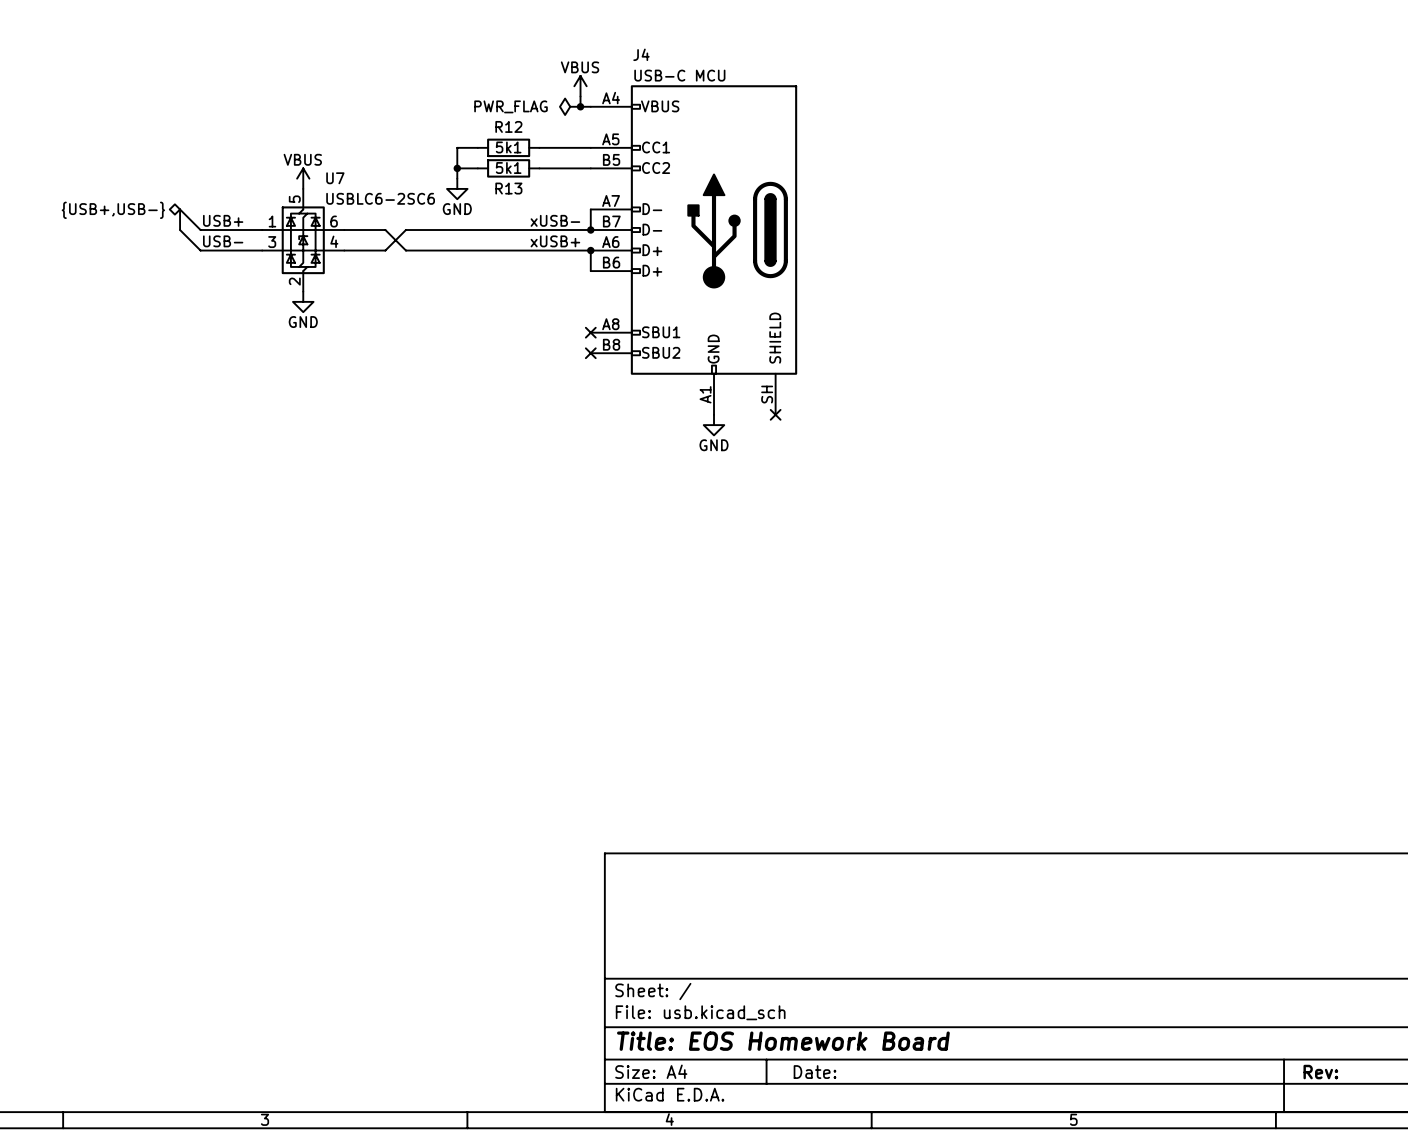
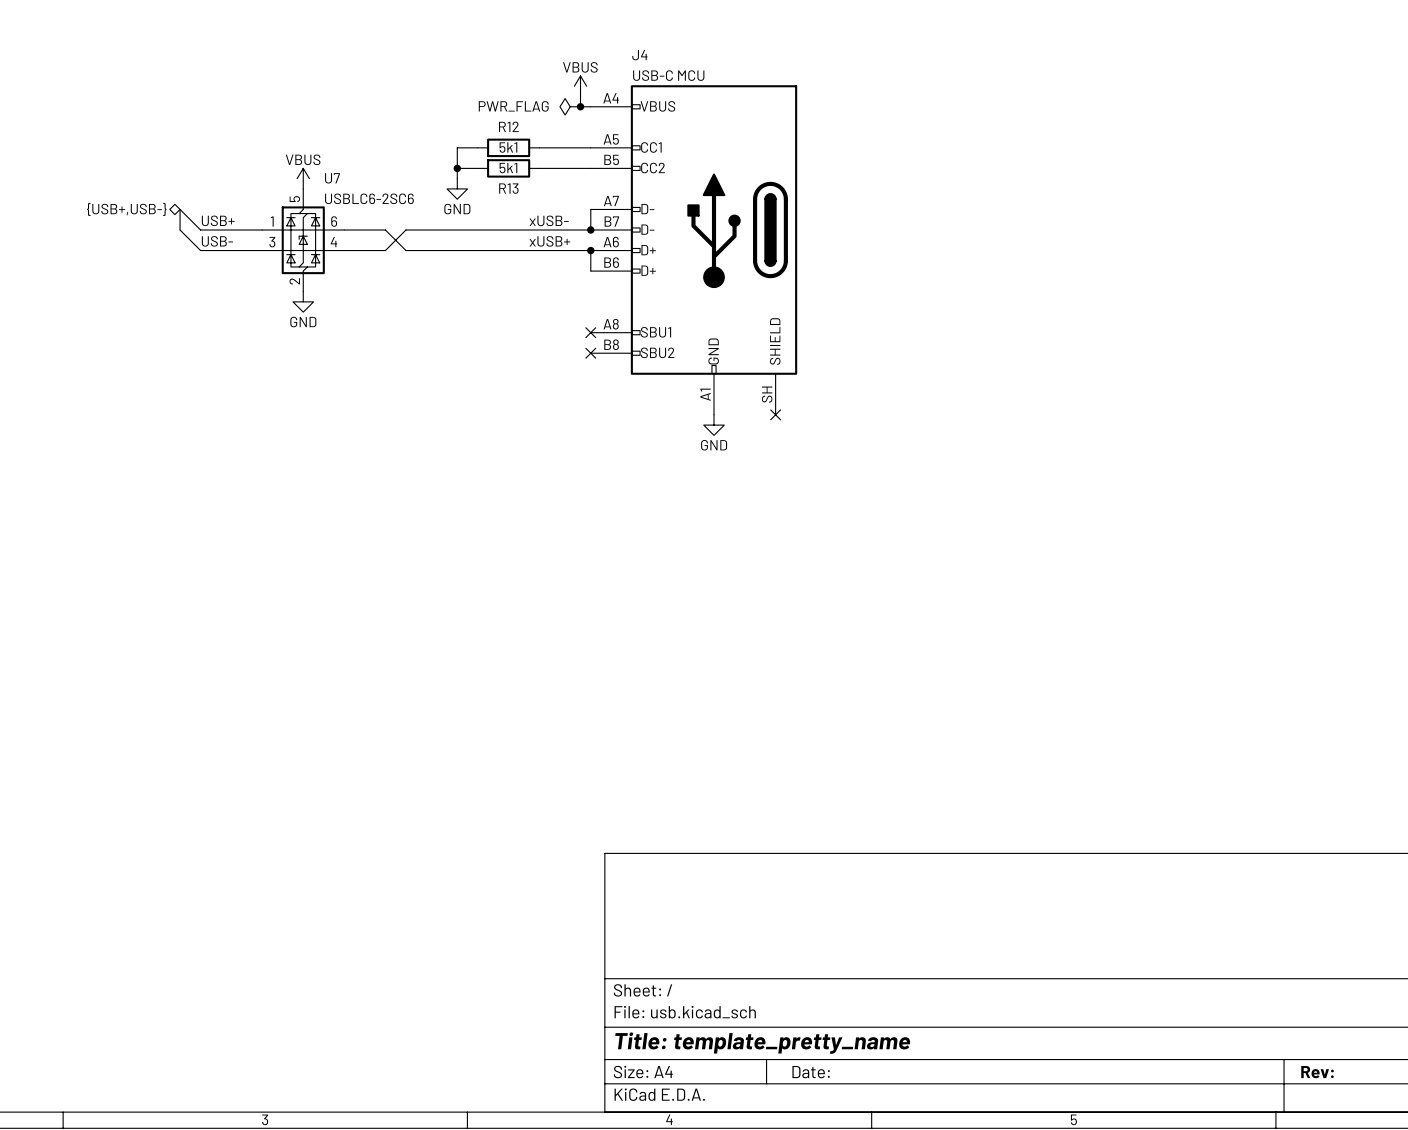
title block: Title: EOS Homework Board (783, 1041) -> Title: template_pretty_name (762, 1043)

